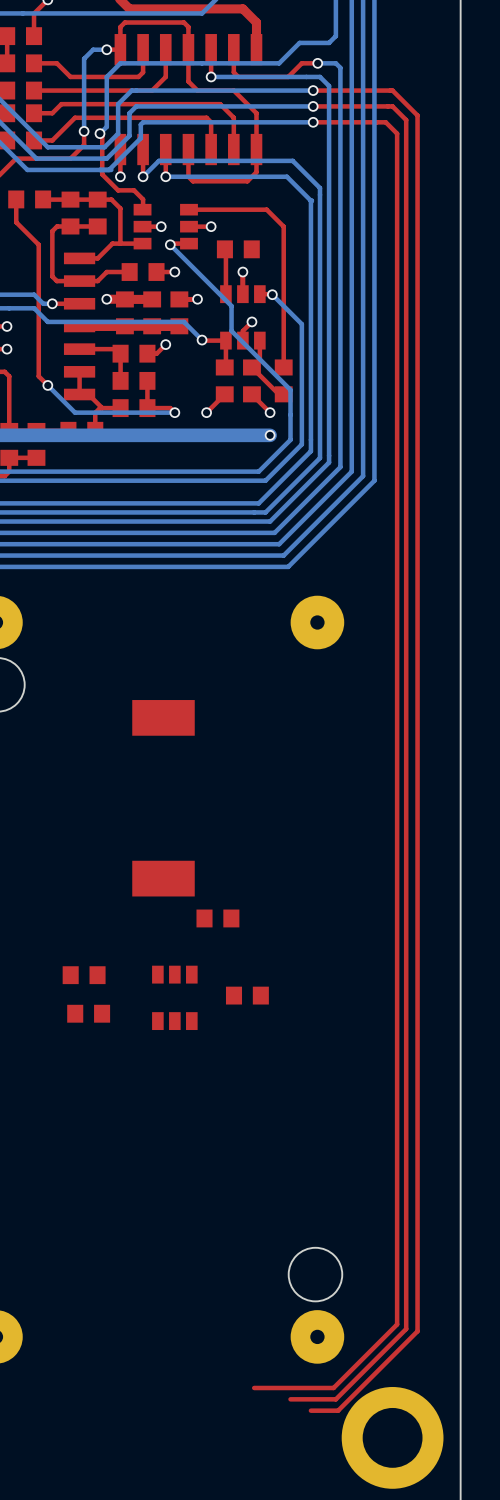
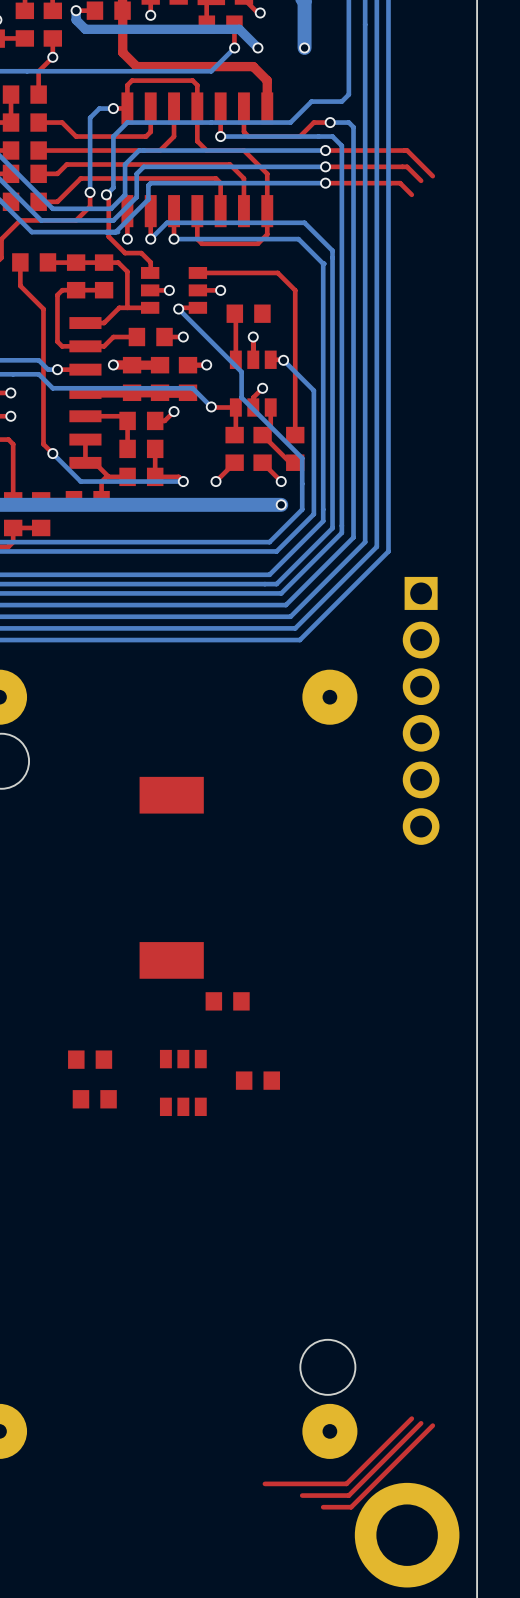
top track: (417, 115) (417, 1331) -> none
top track: (406, 120) (406, 1329) -> none
top track: (397, 133) (397, 1324) -> none
part: none -> (421, 710)

